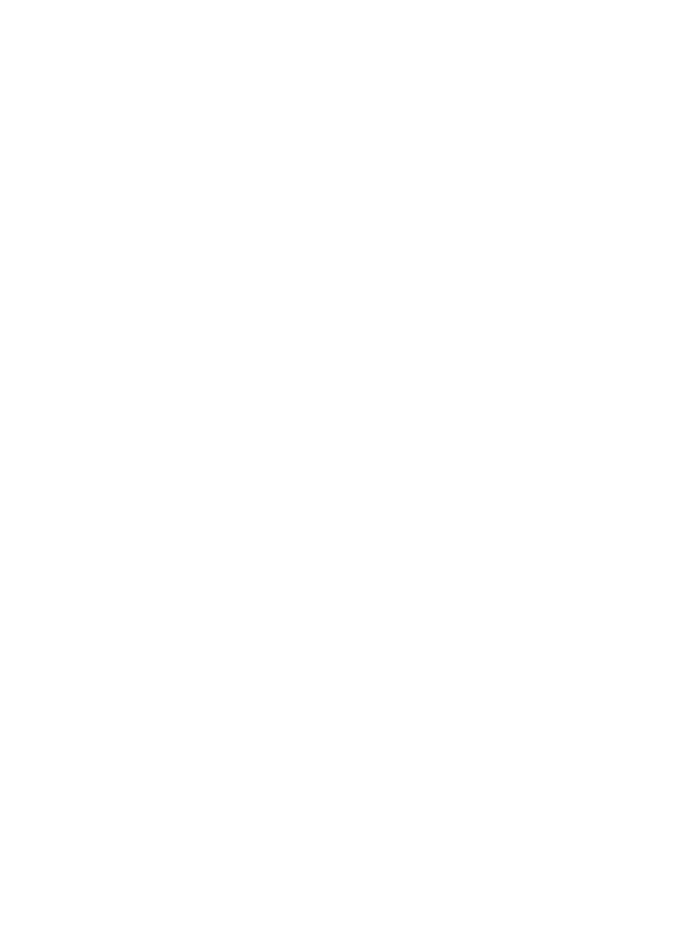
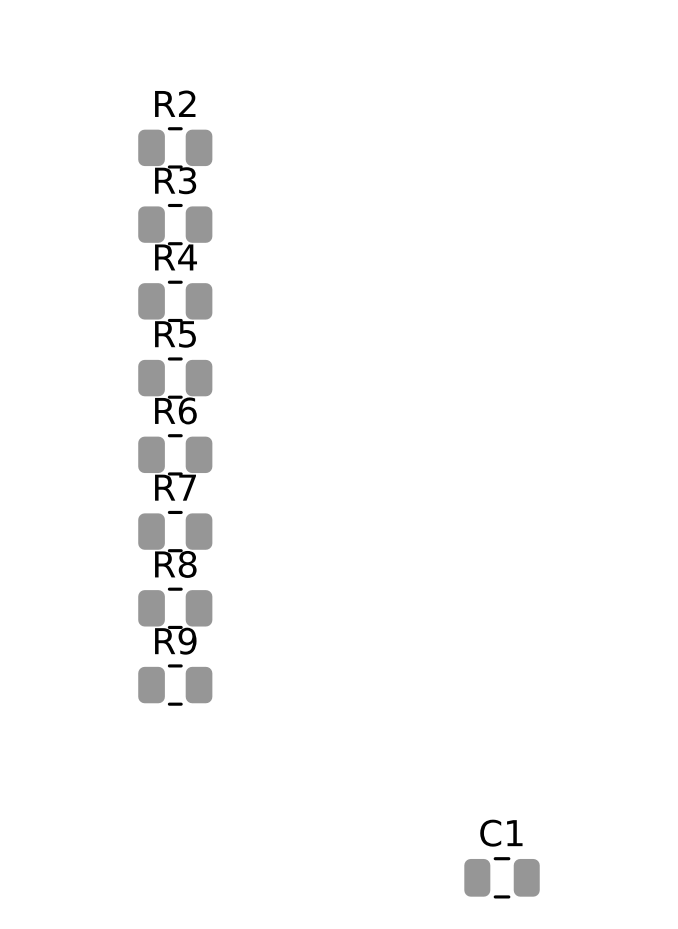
R2: none -> (175, 147)
R3: none -> (175, 224)
R4: none -> (175, 301)
R5: none -> (175, 378)
R6: none -> (175, 454)
R7: none -> (175, 531)
R8: none -> (175, 608)
R9: none -> (175, 685)
C1: none -> (502, 877)

